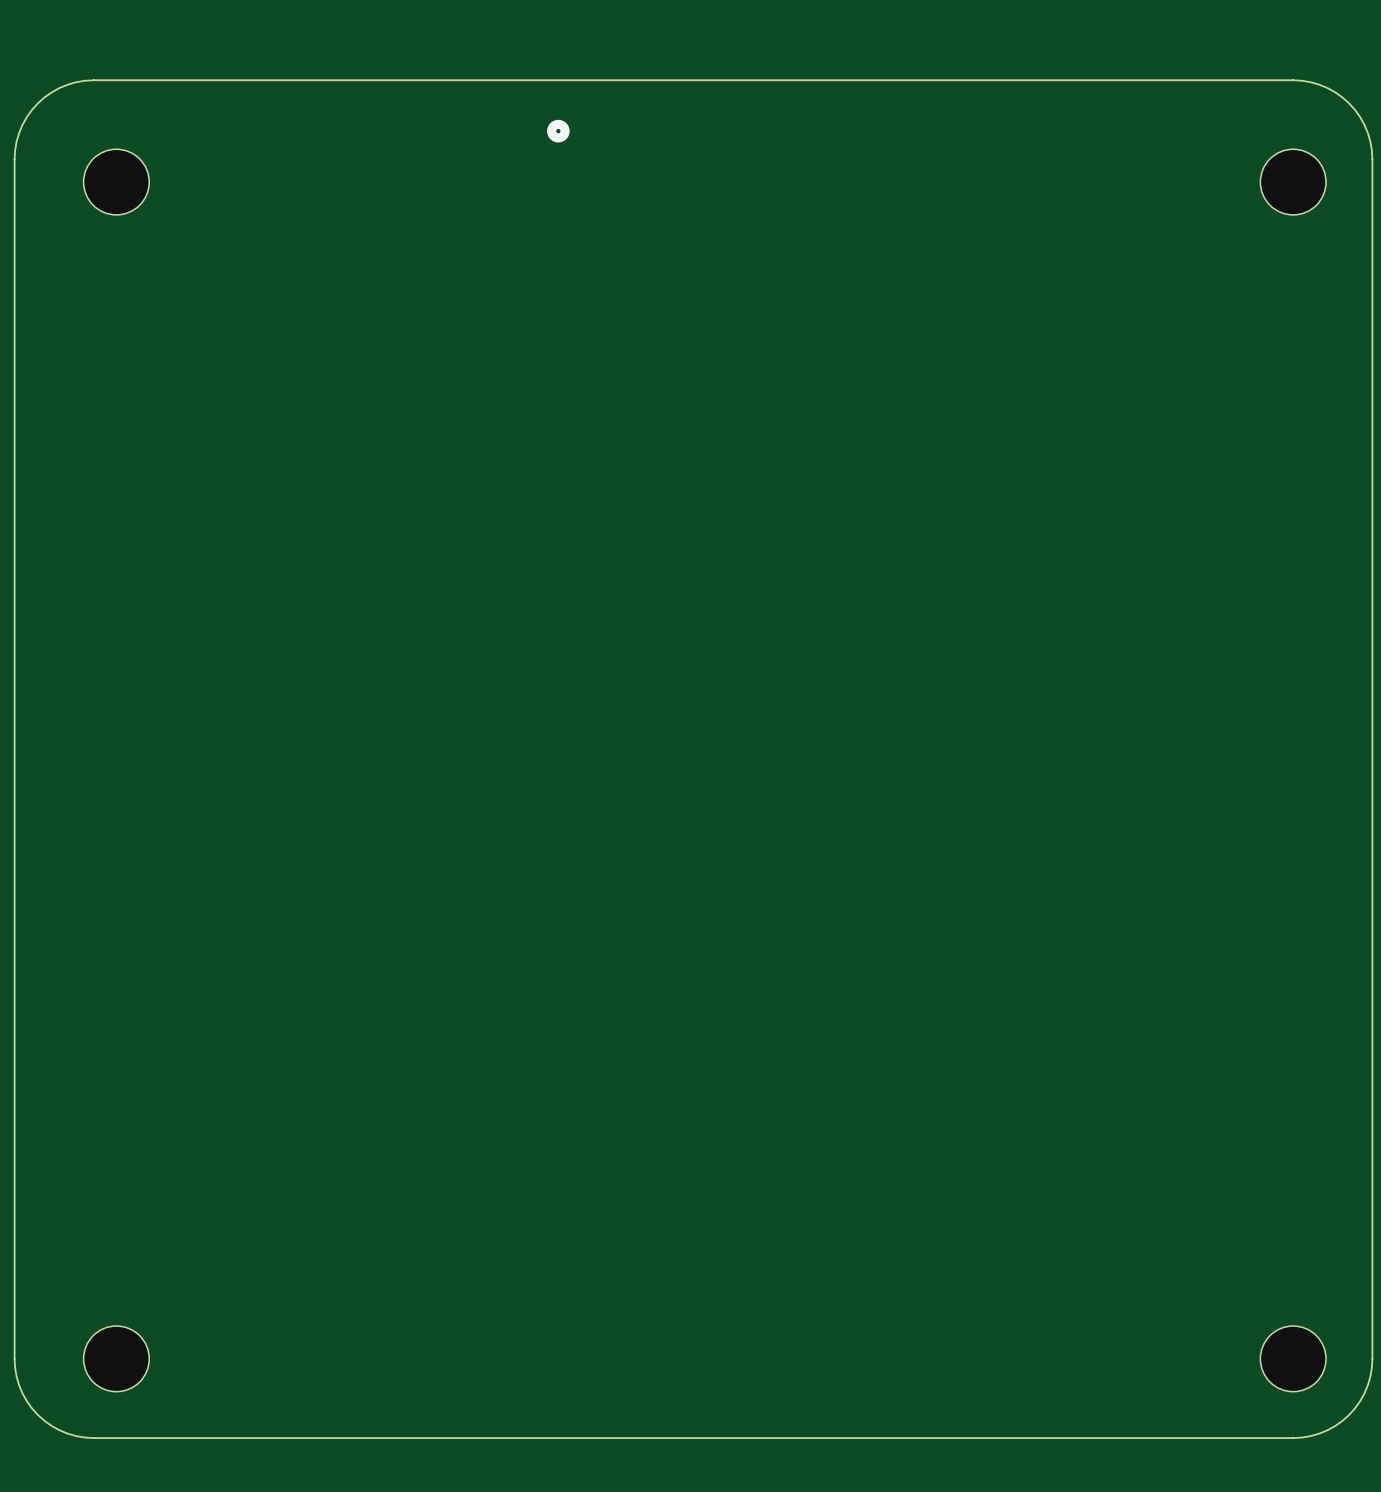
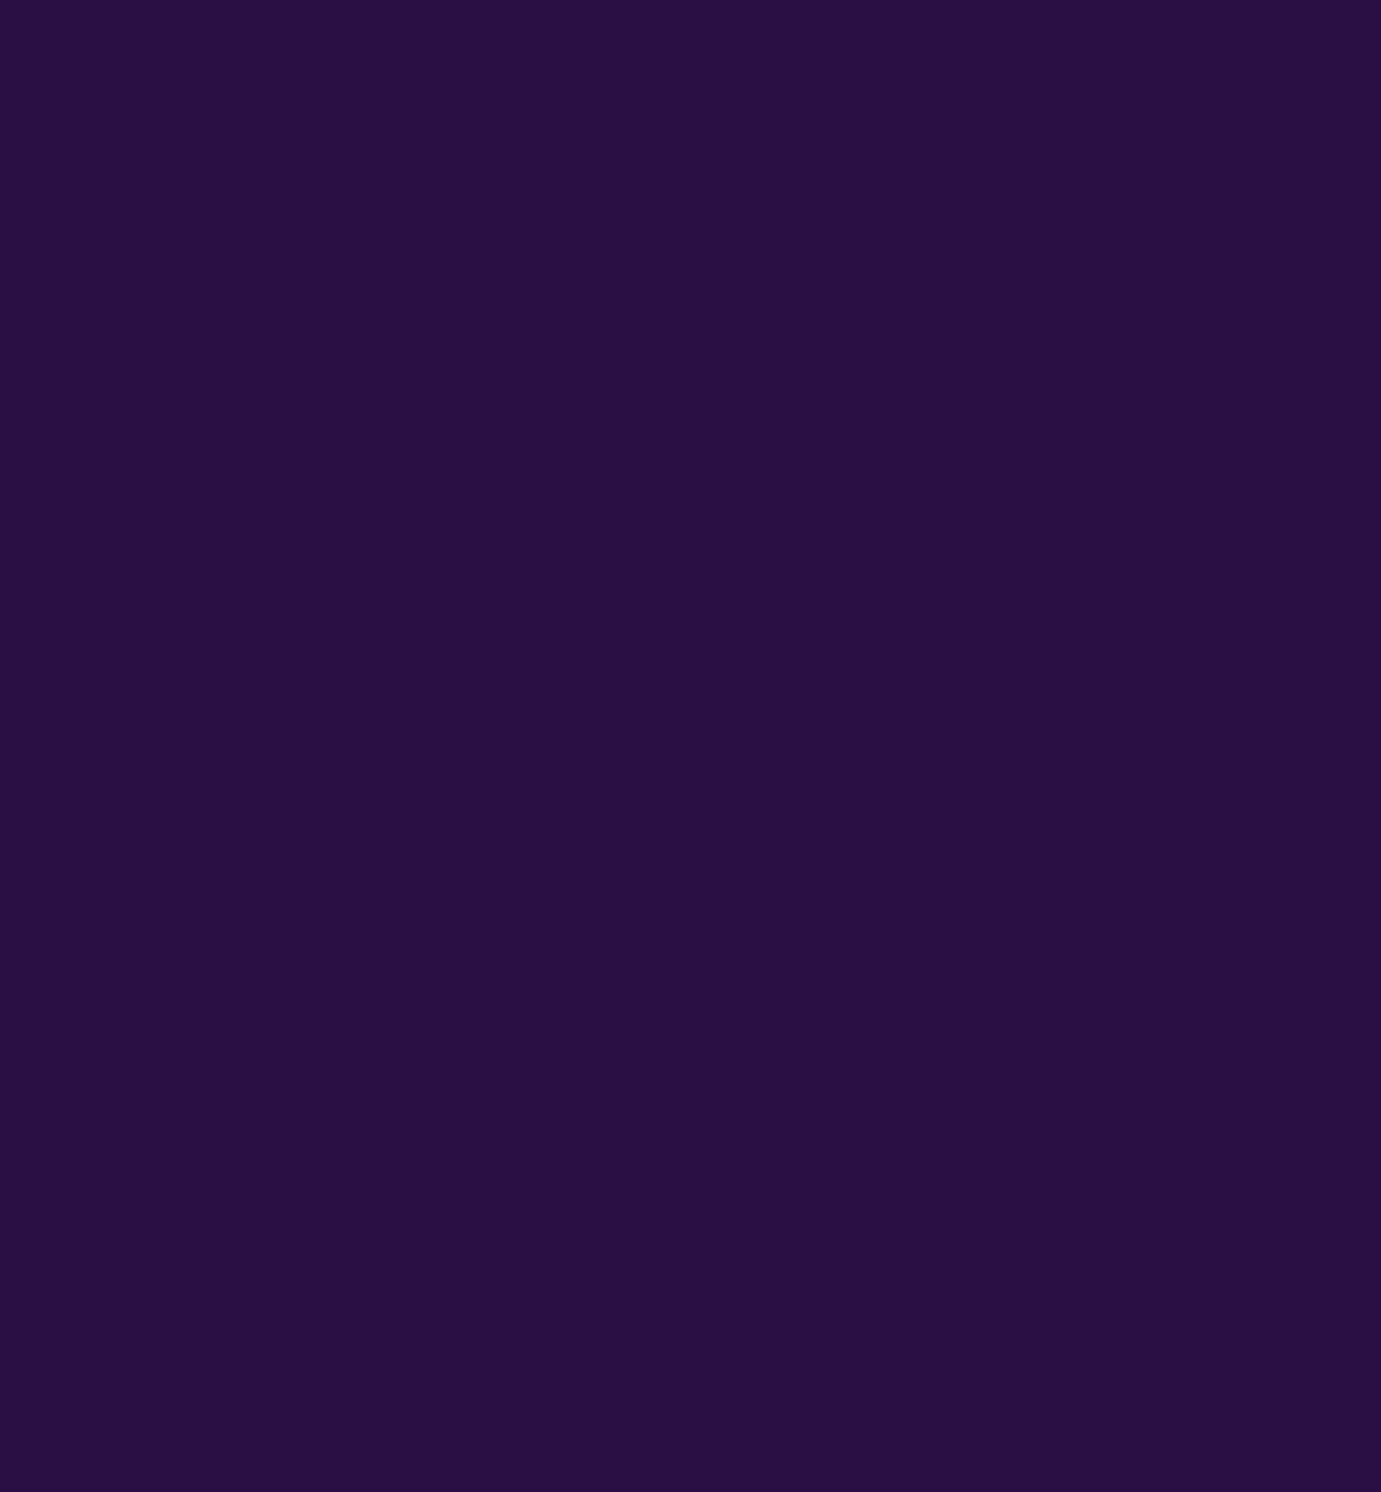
board edge: (1293, 80) (93, 80) (67, 84) (51, 92) (37, 103) (26, 117) (19, 133) (14, 159) (14, 1358) (16, 1376) (22, 1393) (37, 1414) (51, 1425) (67, 1433) (93, 1438) (1293, 1438) (1310, 1436) (1327, 1430) (1349, 1414) (1364, 1393) (1370, 1376) (1372, 1358) (1372, 159) (1367, 133) (1360, 117) (1349, 103) (1335, 92) (1319, 84) (1293, 80) -> none
part: (558, 131) -> none
part: (116, 182) -> none
part: (1293, 182) -> none
part: (116, 1358) -> none
part: (1293, 1358) -> none

